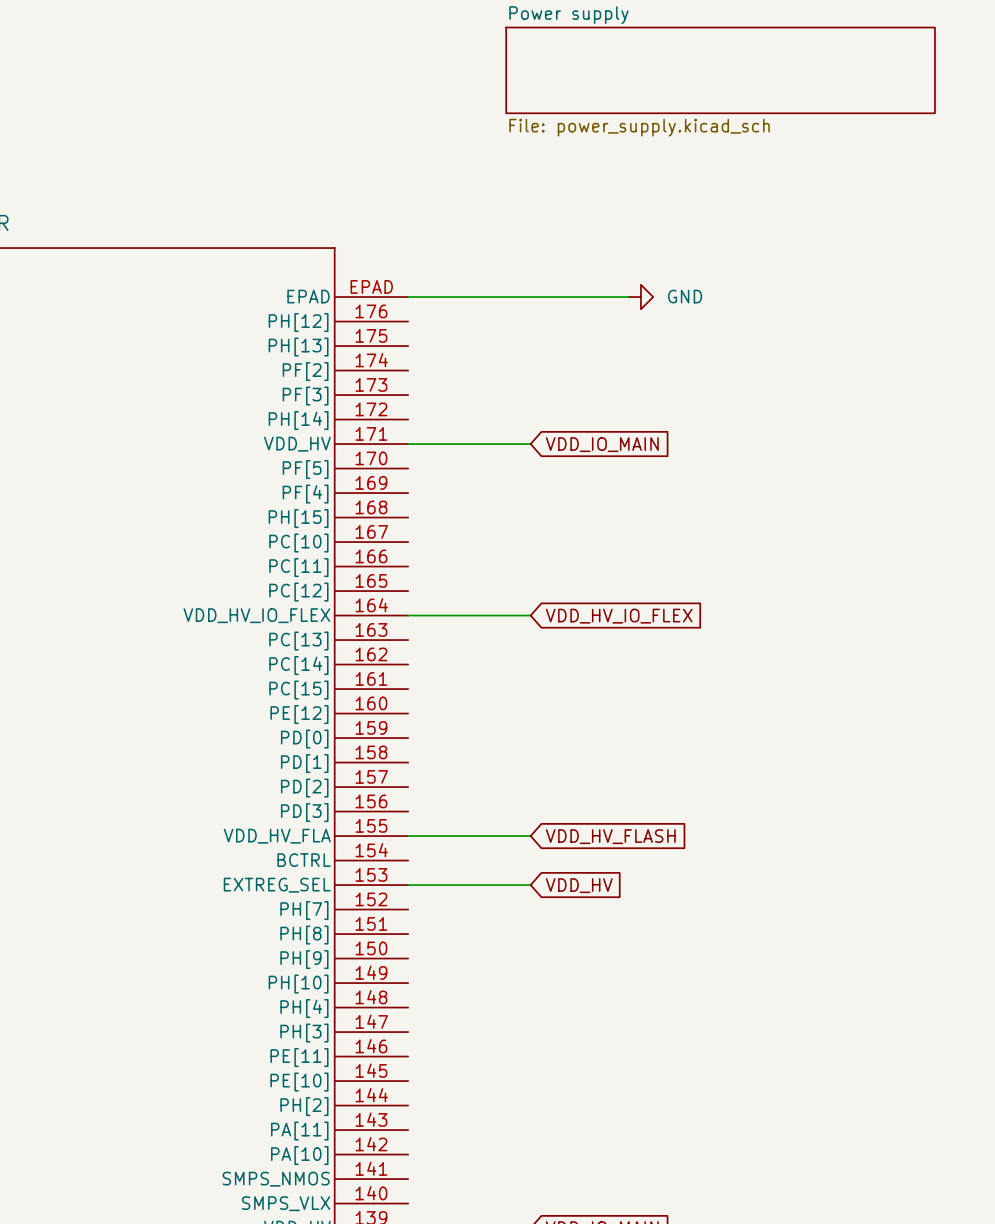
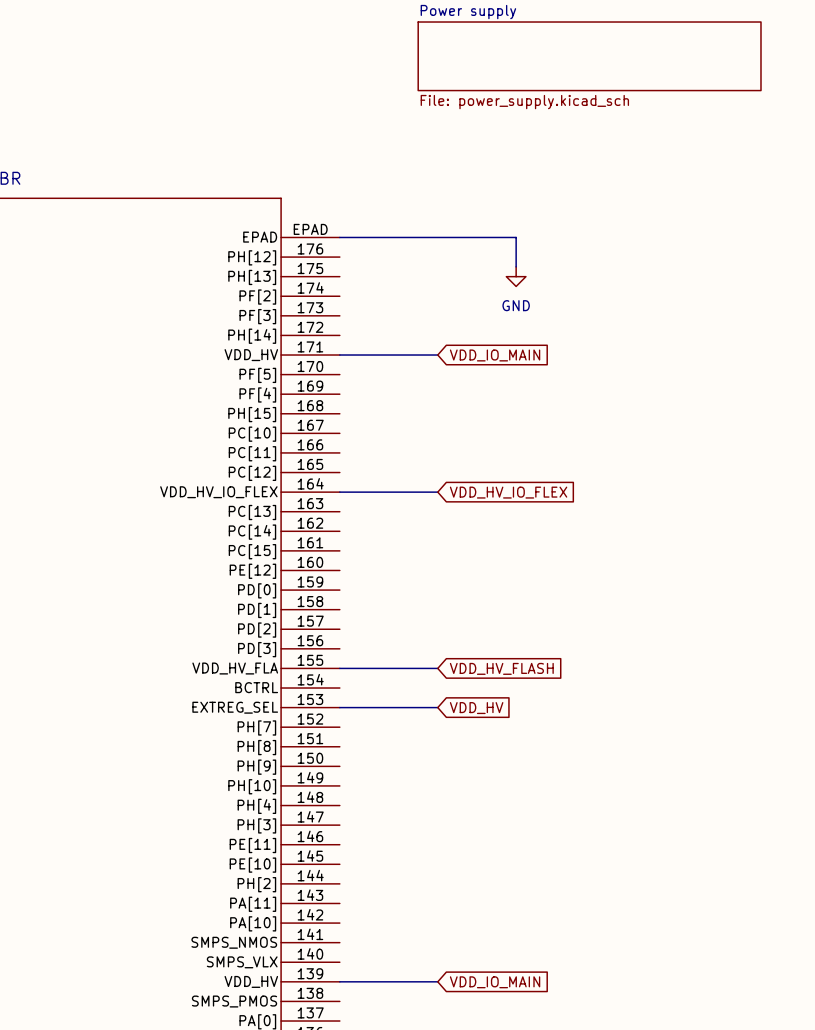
wire: none -> (516, 237) (516, 266)
power symbol rotation: 0° (640, 297) -> 90° clockwise (516, 276)
power symbol position: GND (640, 297) -> GND (516, 276)

